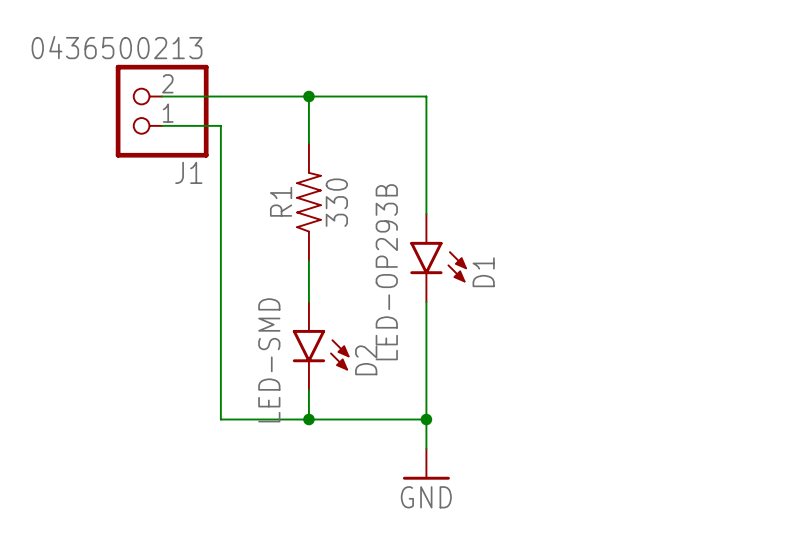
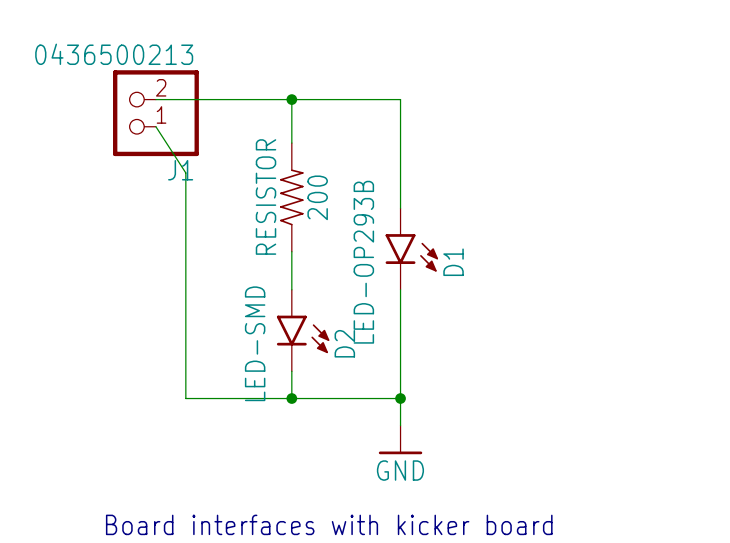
wire: (162, 125) (220, 125) (220, 419) -> (155, 126) (185, 172) (185, 398) (210, 398)
R1 name: R1 (281, 201) -> RESISTOR (266, 197)
R1 value: 330 (336, 202) -> 200 (317, 197)

